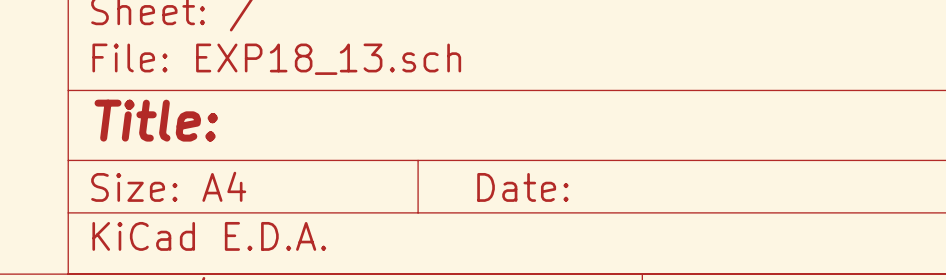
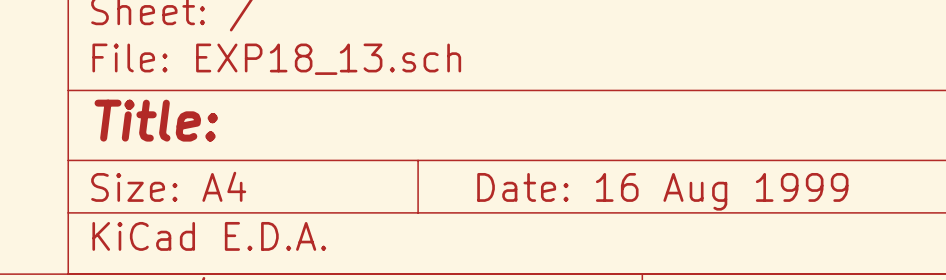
title block: Date: (522, 187) -> Date: 16 Aug 1999 (662, 191)

